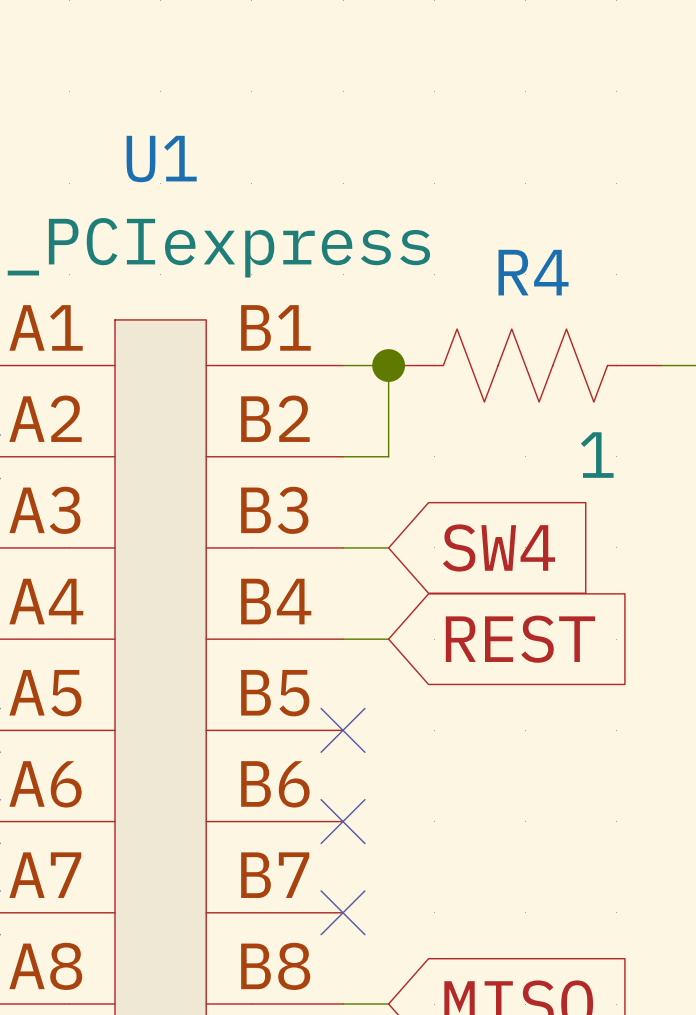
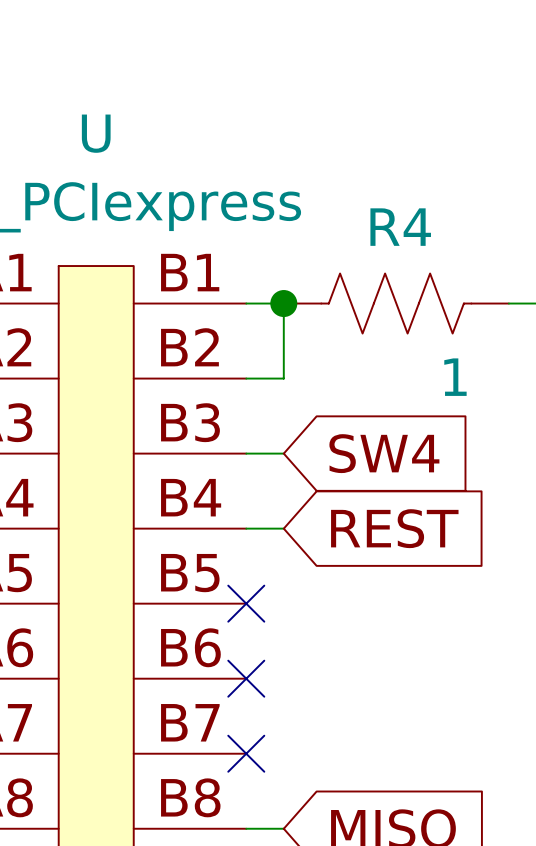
U1 name: U1 (161, 159) -> U (96, 133)

